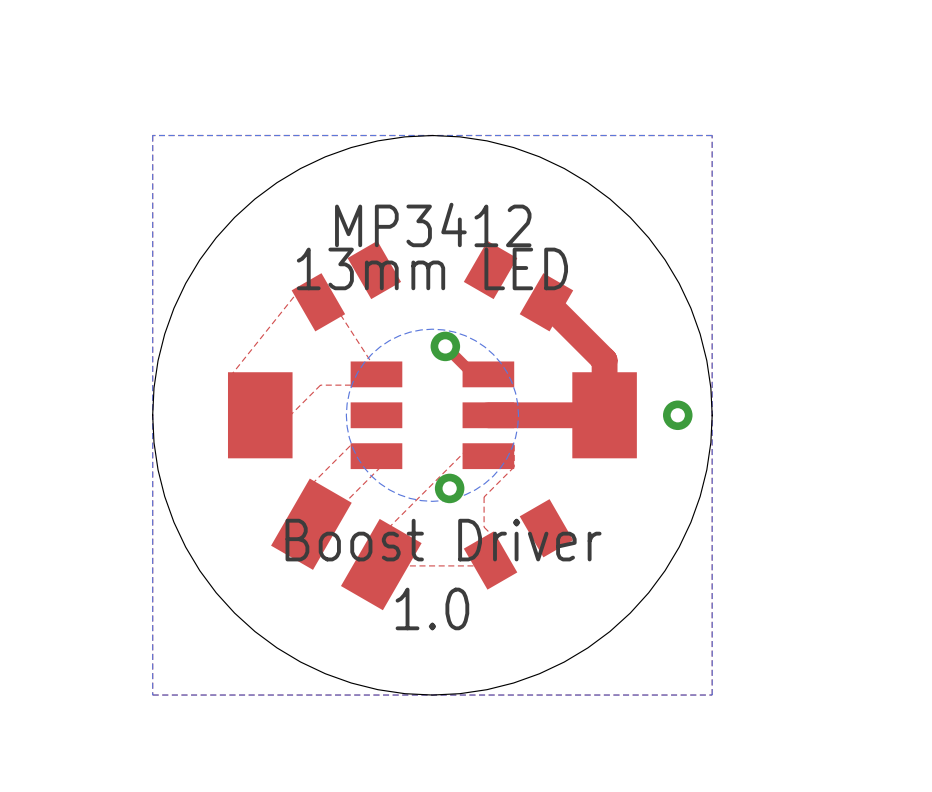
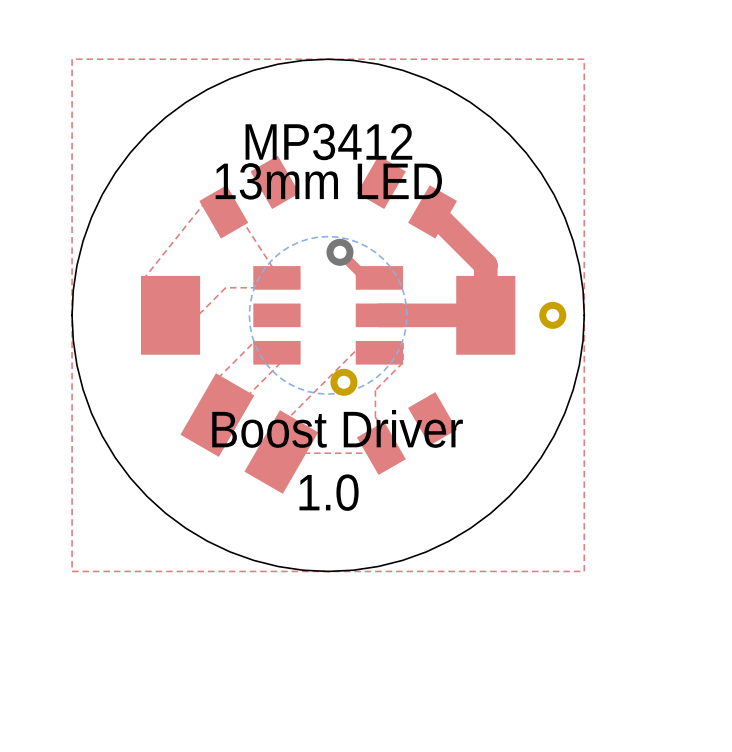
bottom zone outline: (712, 135) (712, 695) (152, 695) (152, 135) (712, 135) -> none

